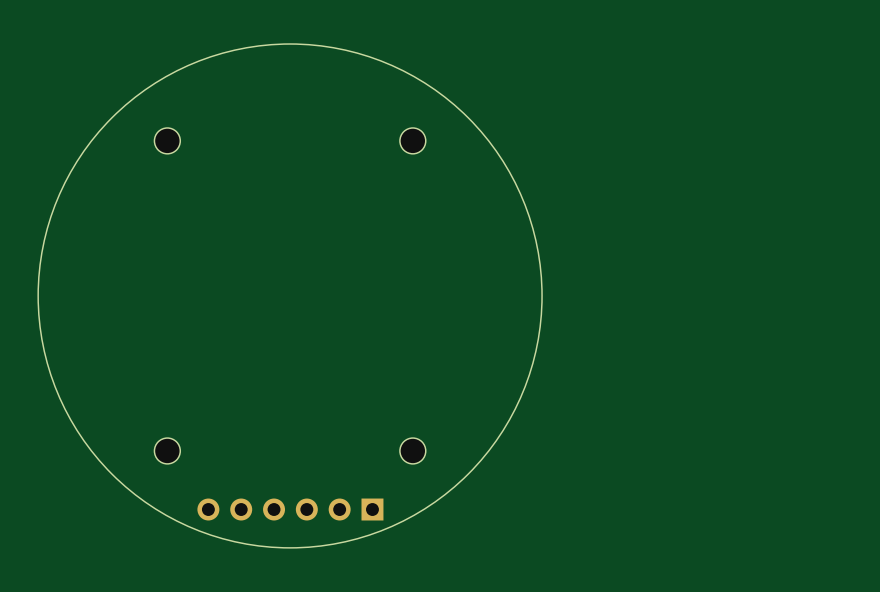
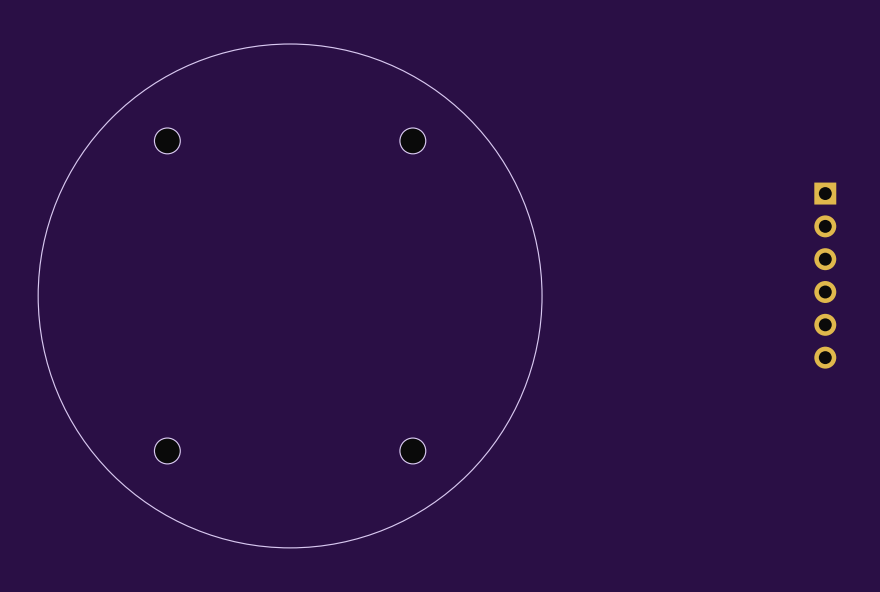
part: none -> (825, 275)
part: (290, 509) -> none

